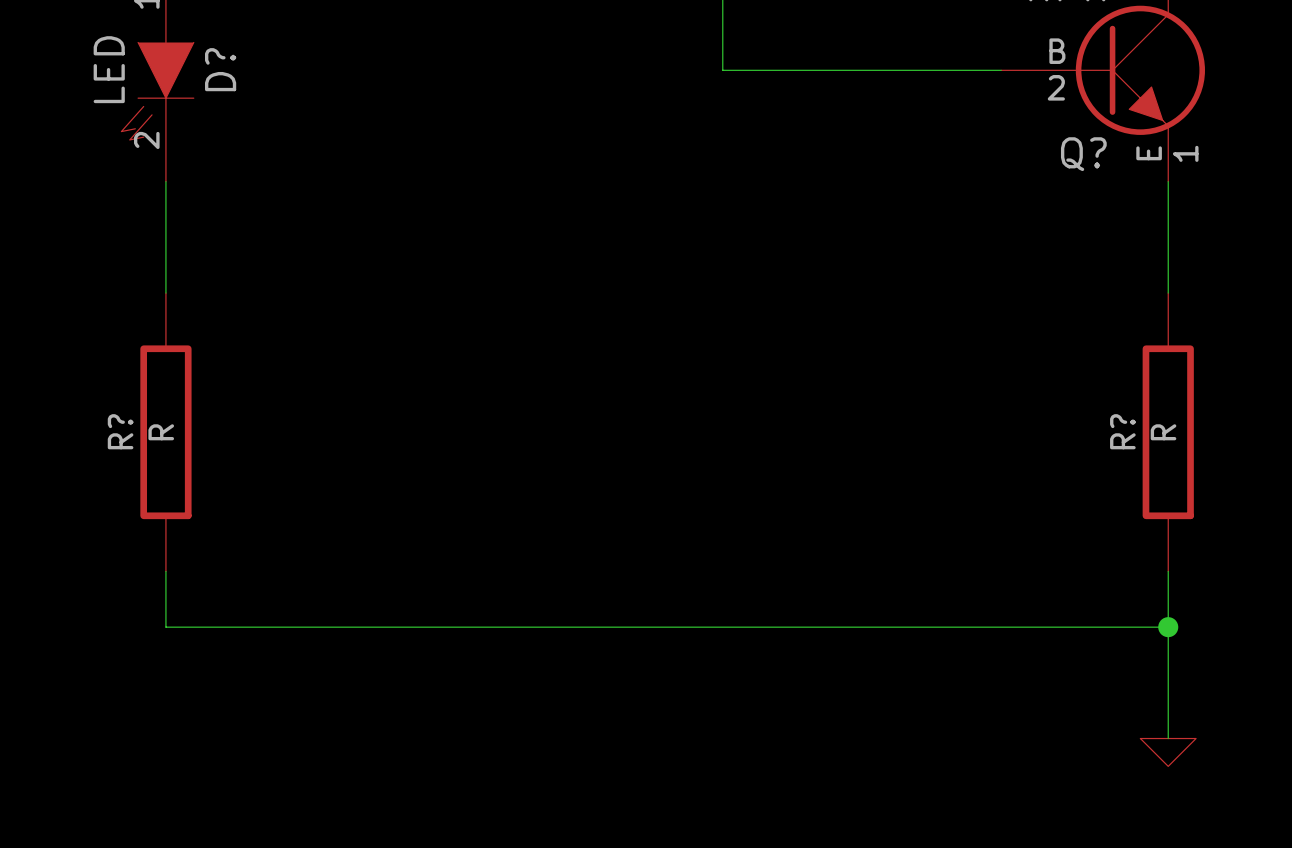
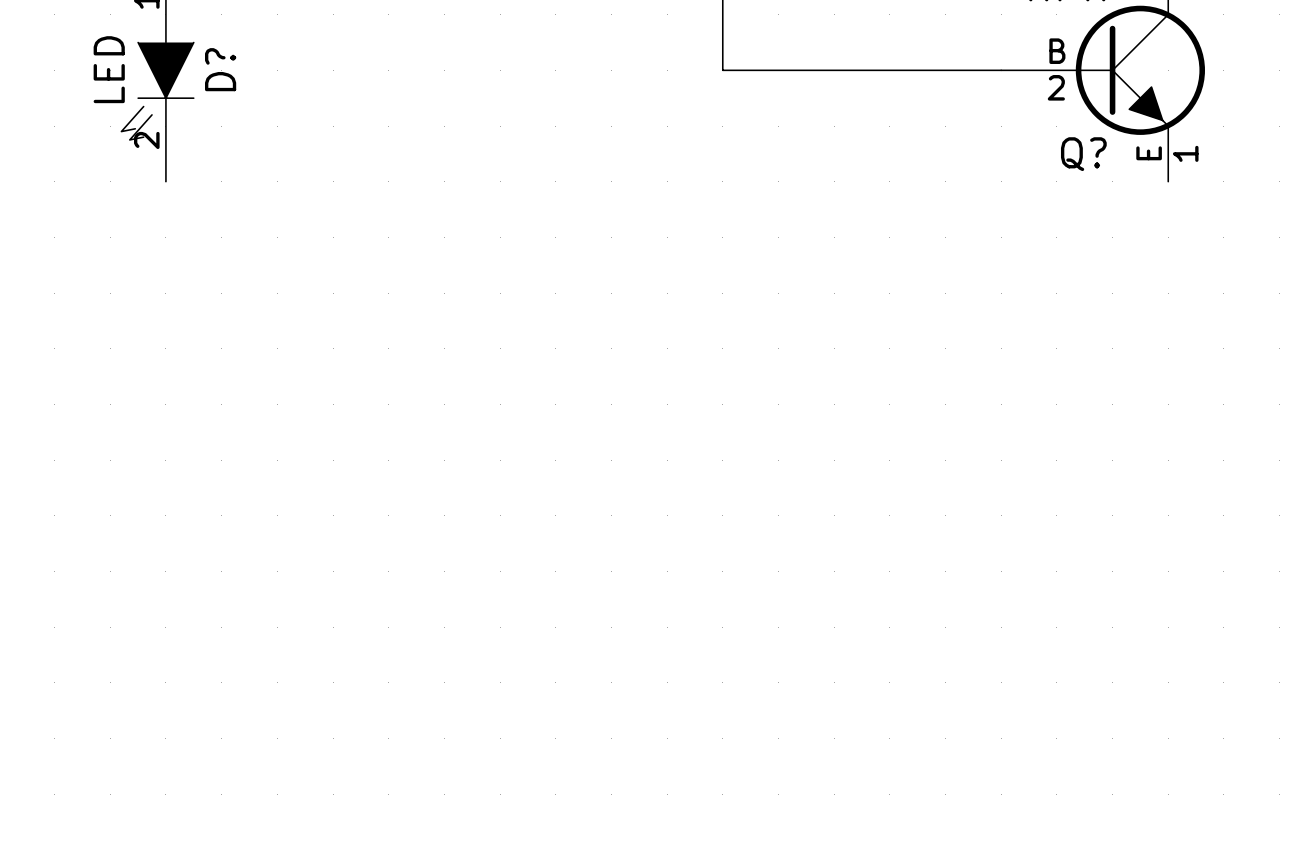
wire: (165, 181) (165, 293) -> none
wire: (1168, 181) (1168, 293) -> none
R?: R (165, 432) -> none
R?: R (1168, 432) -> none
wire: (165, 571) (165, 627) (1168, 627) -> none
wire: (1168, 571) (1168, 738) -> none
junction: (1168, 627) -> none
power symbol: (1168, 752) -> none

